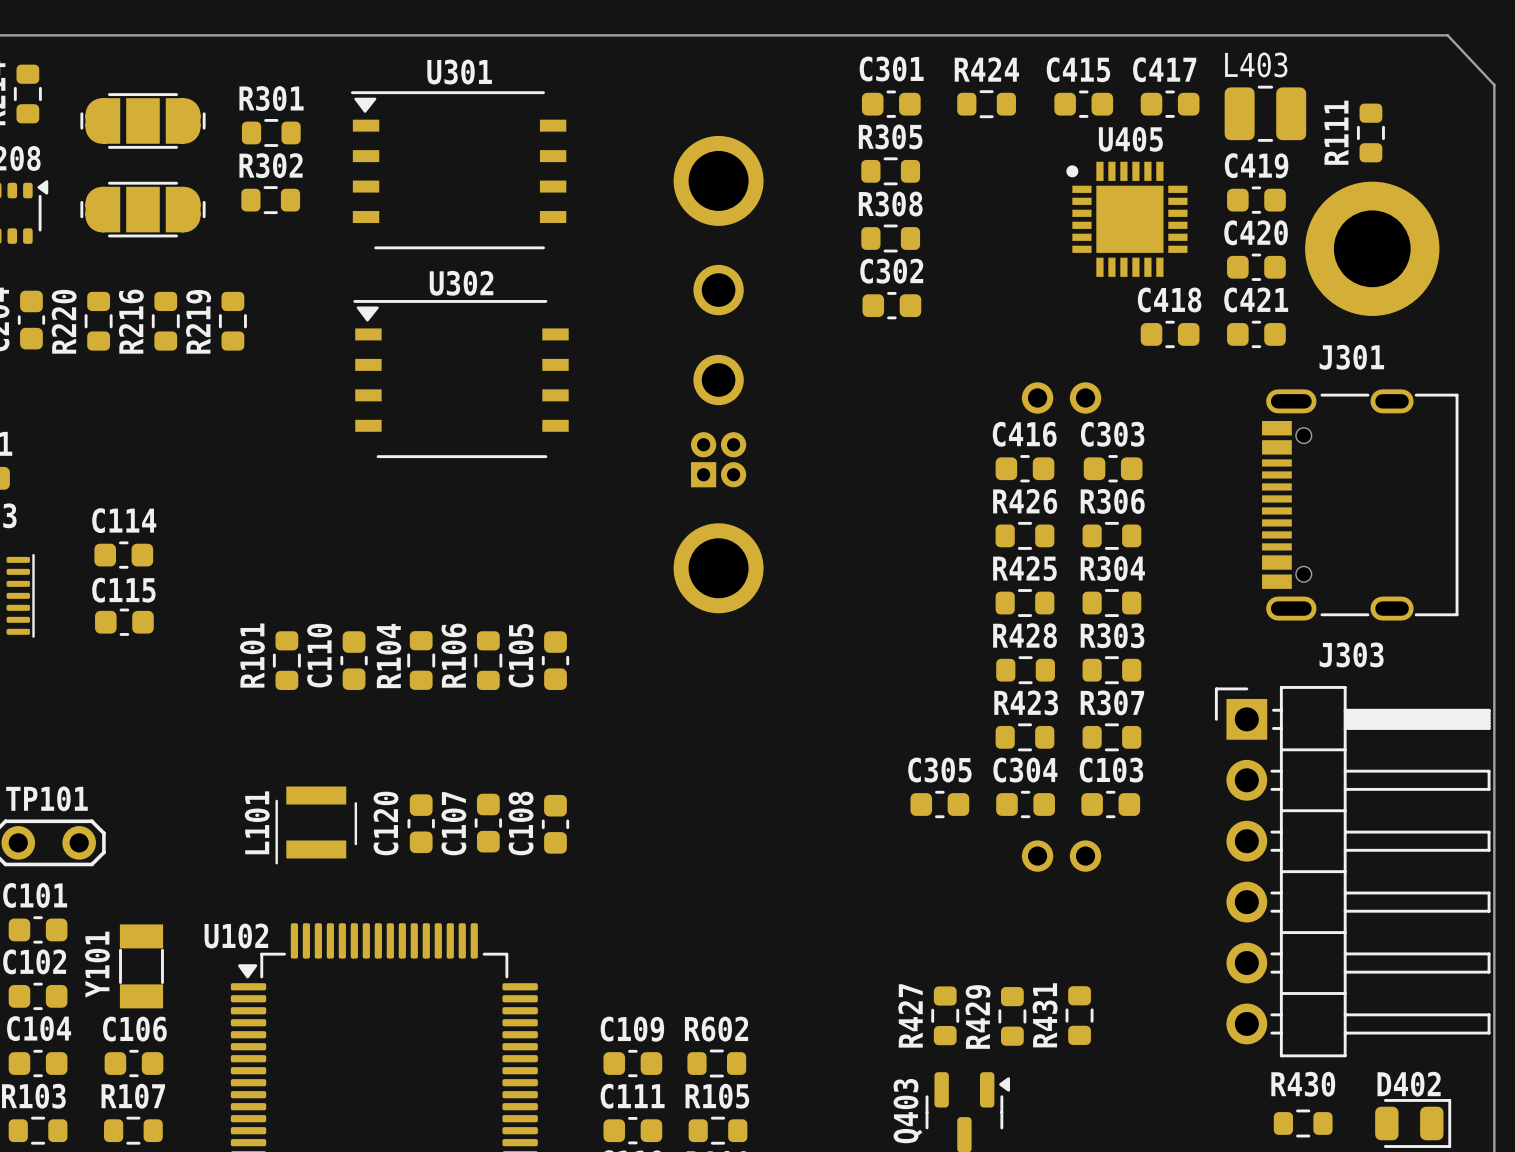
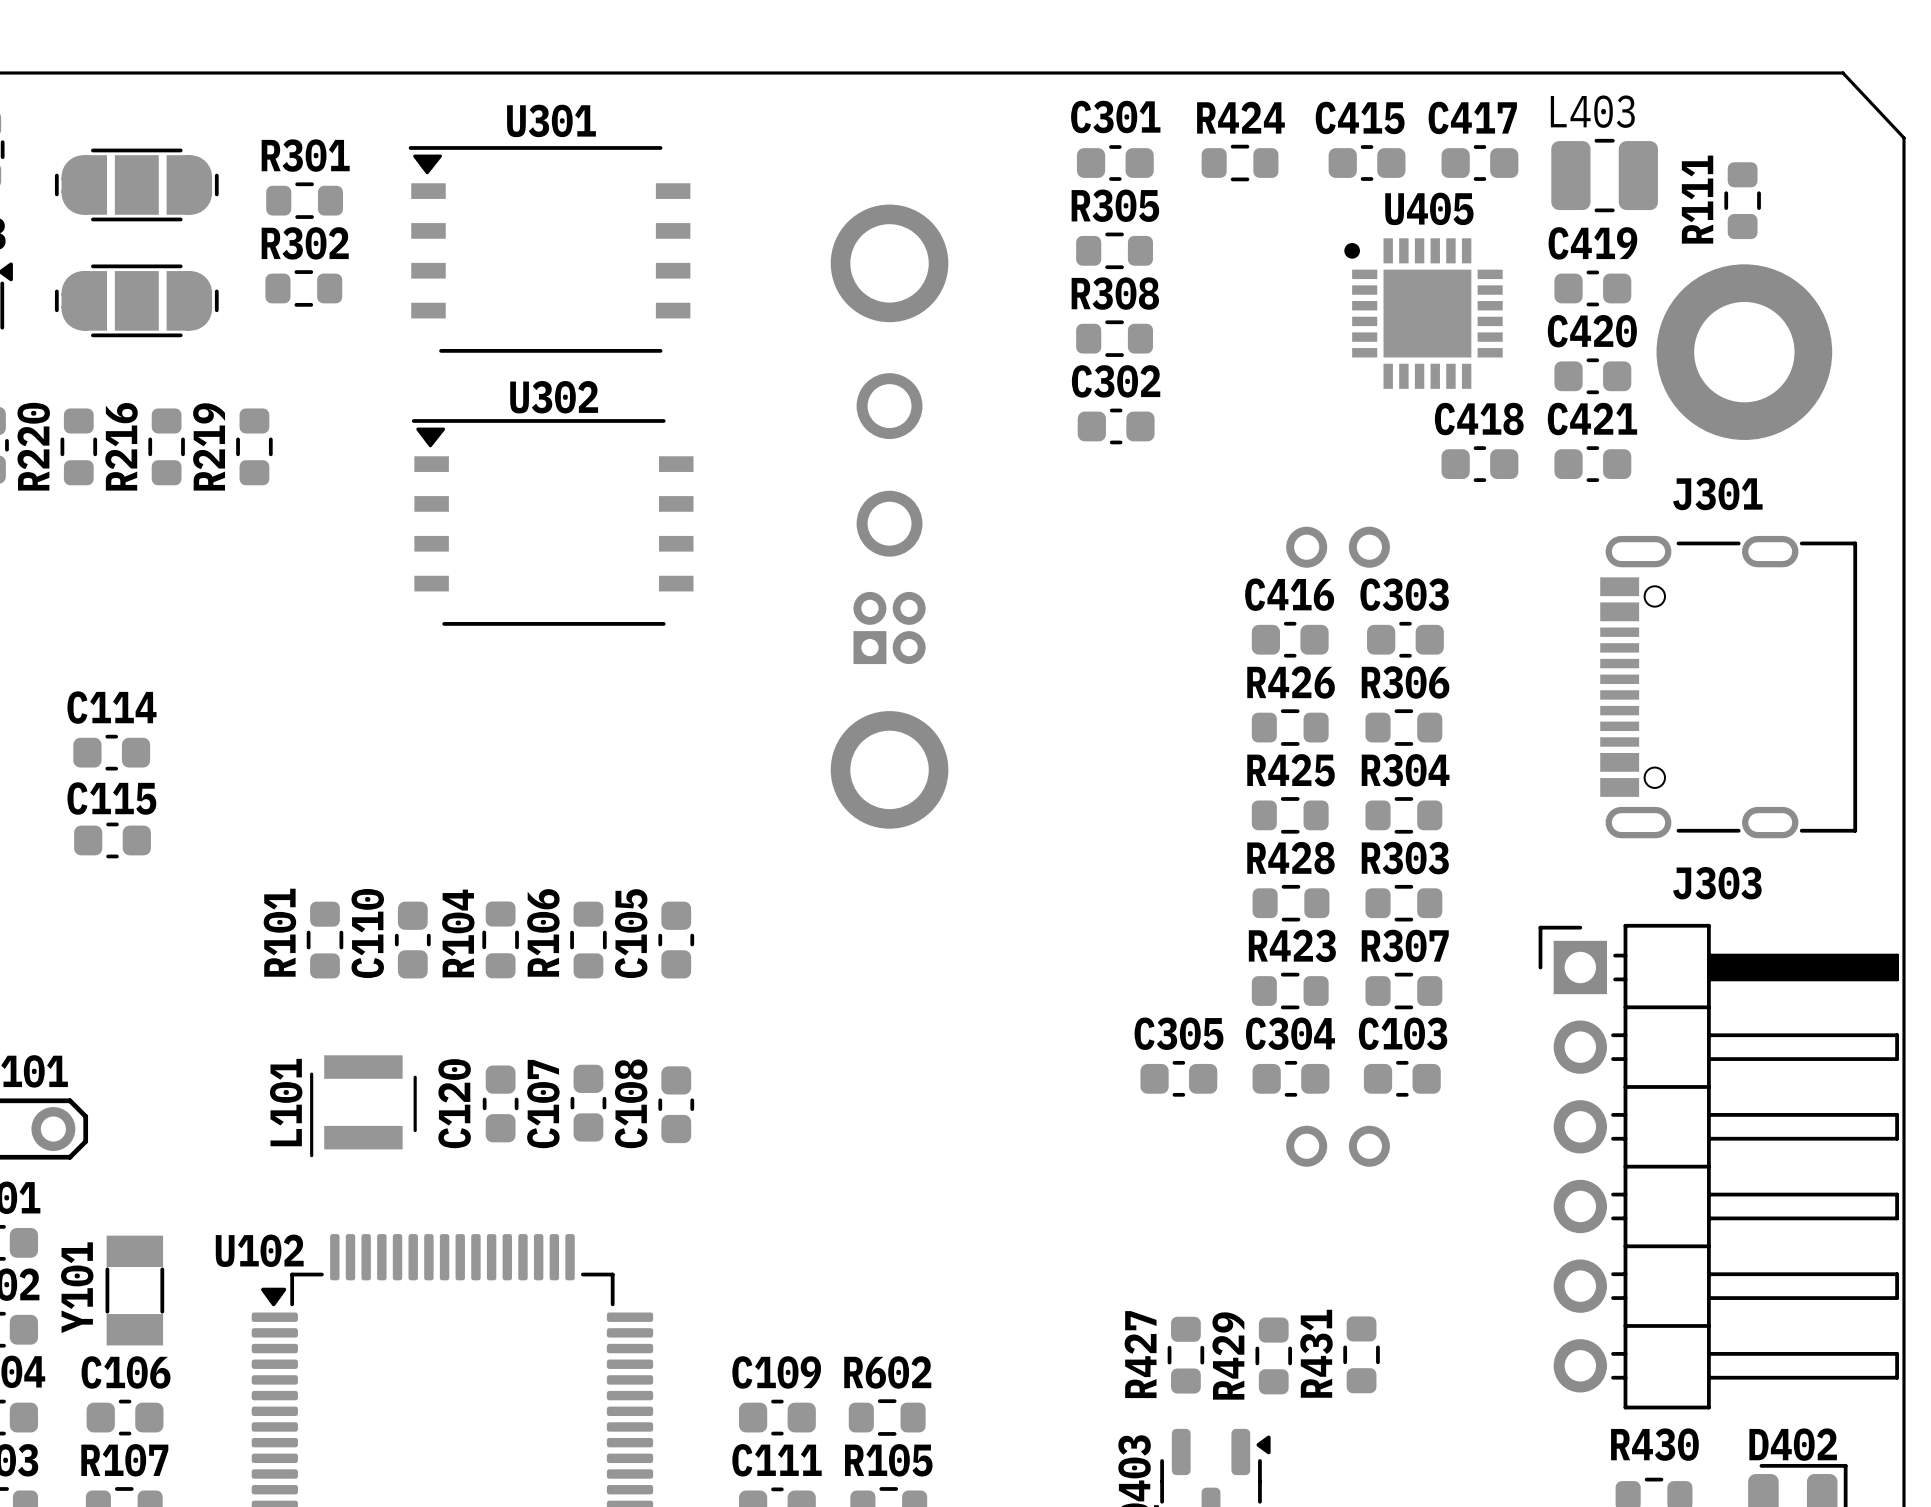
R101 position: (286, 660) -> (324, 940)
C110 position: (354, 660) -> (412, 940)
R104 position: (421, 660) -> (500, 939)
R106 position: (488, 660) -> (588, 940)
C105 position: (555, 660) -> (676, 940)

